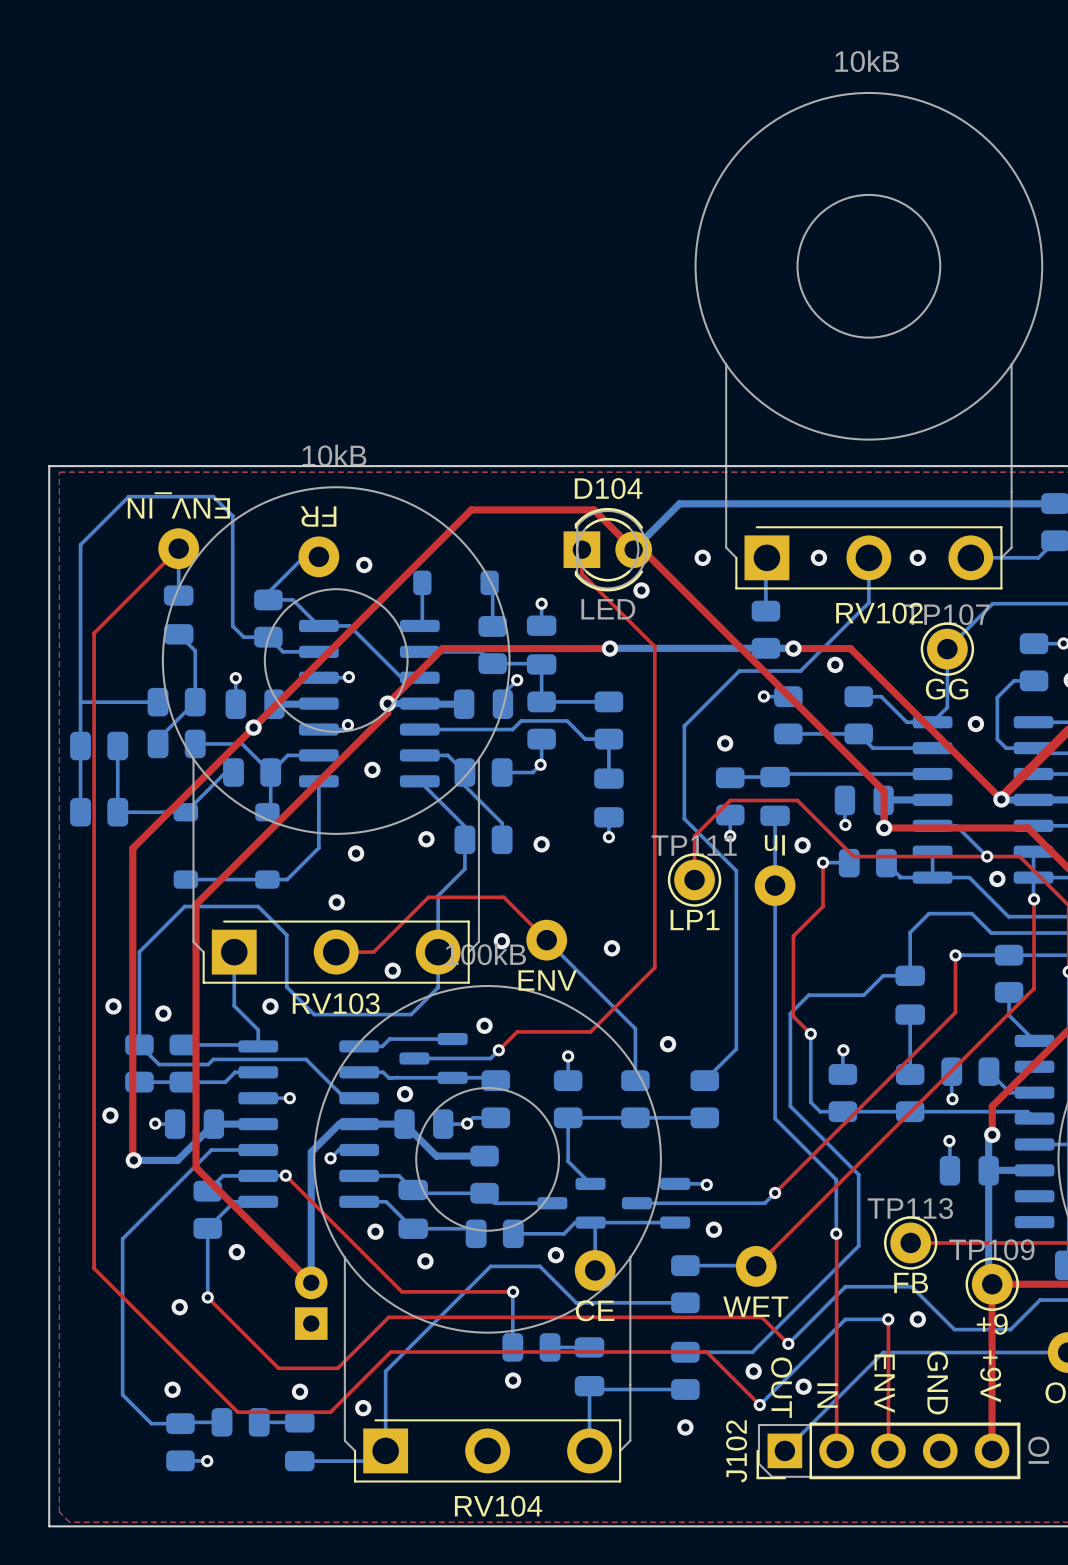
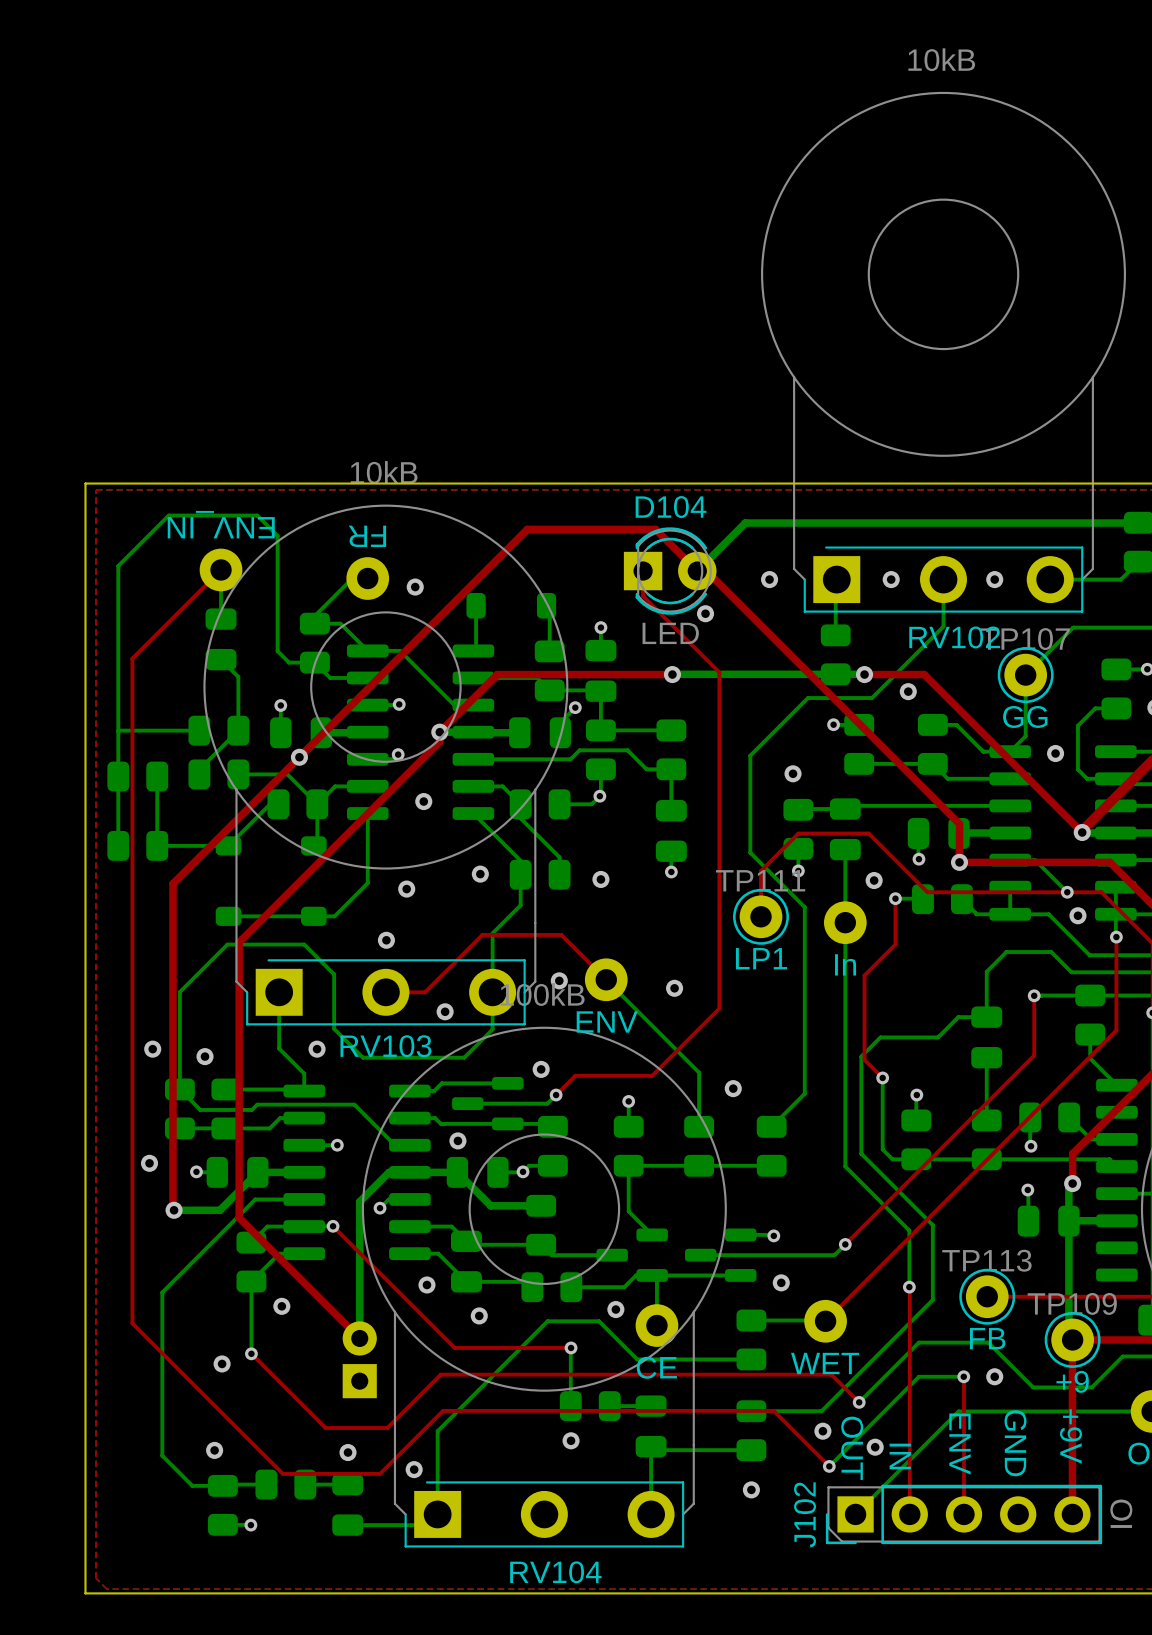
part value rotation: 0° (774, 845) -> 180° (845, 964)
part value position: In (774, 845) -> In (845, 964)

